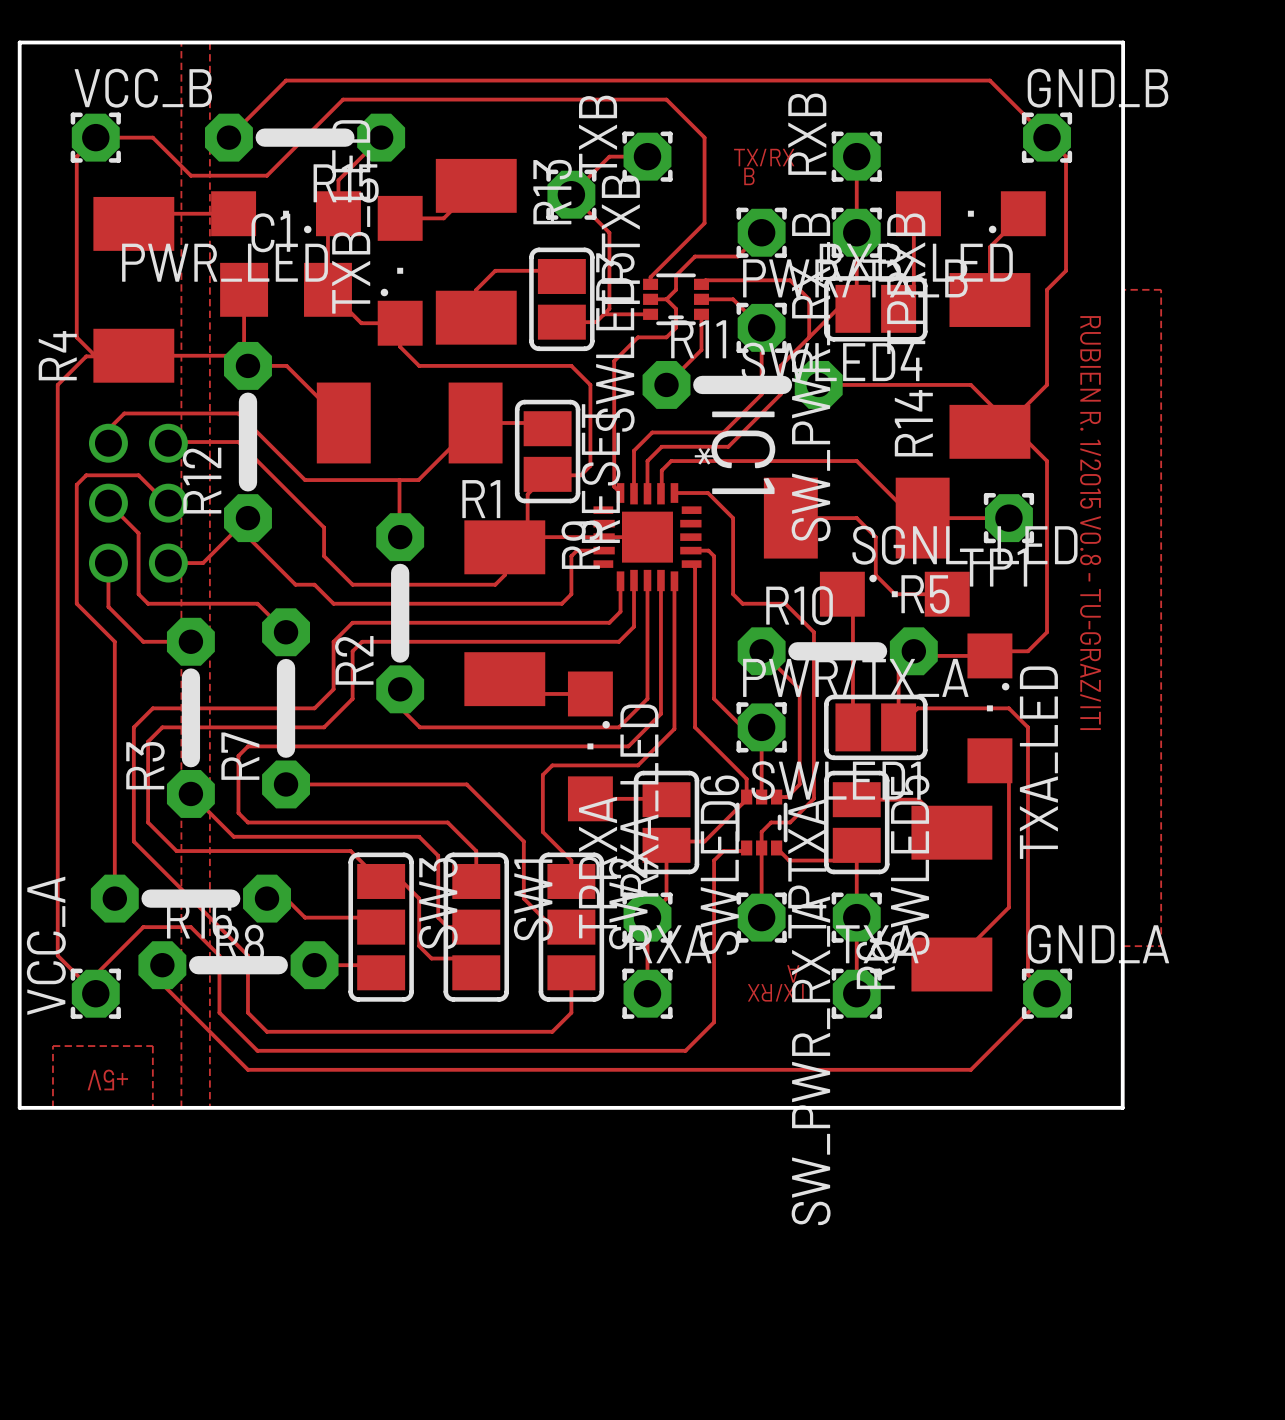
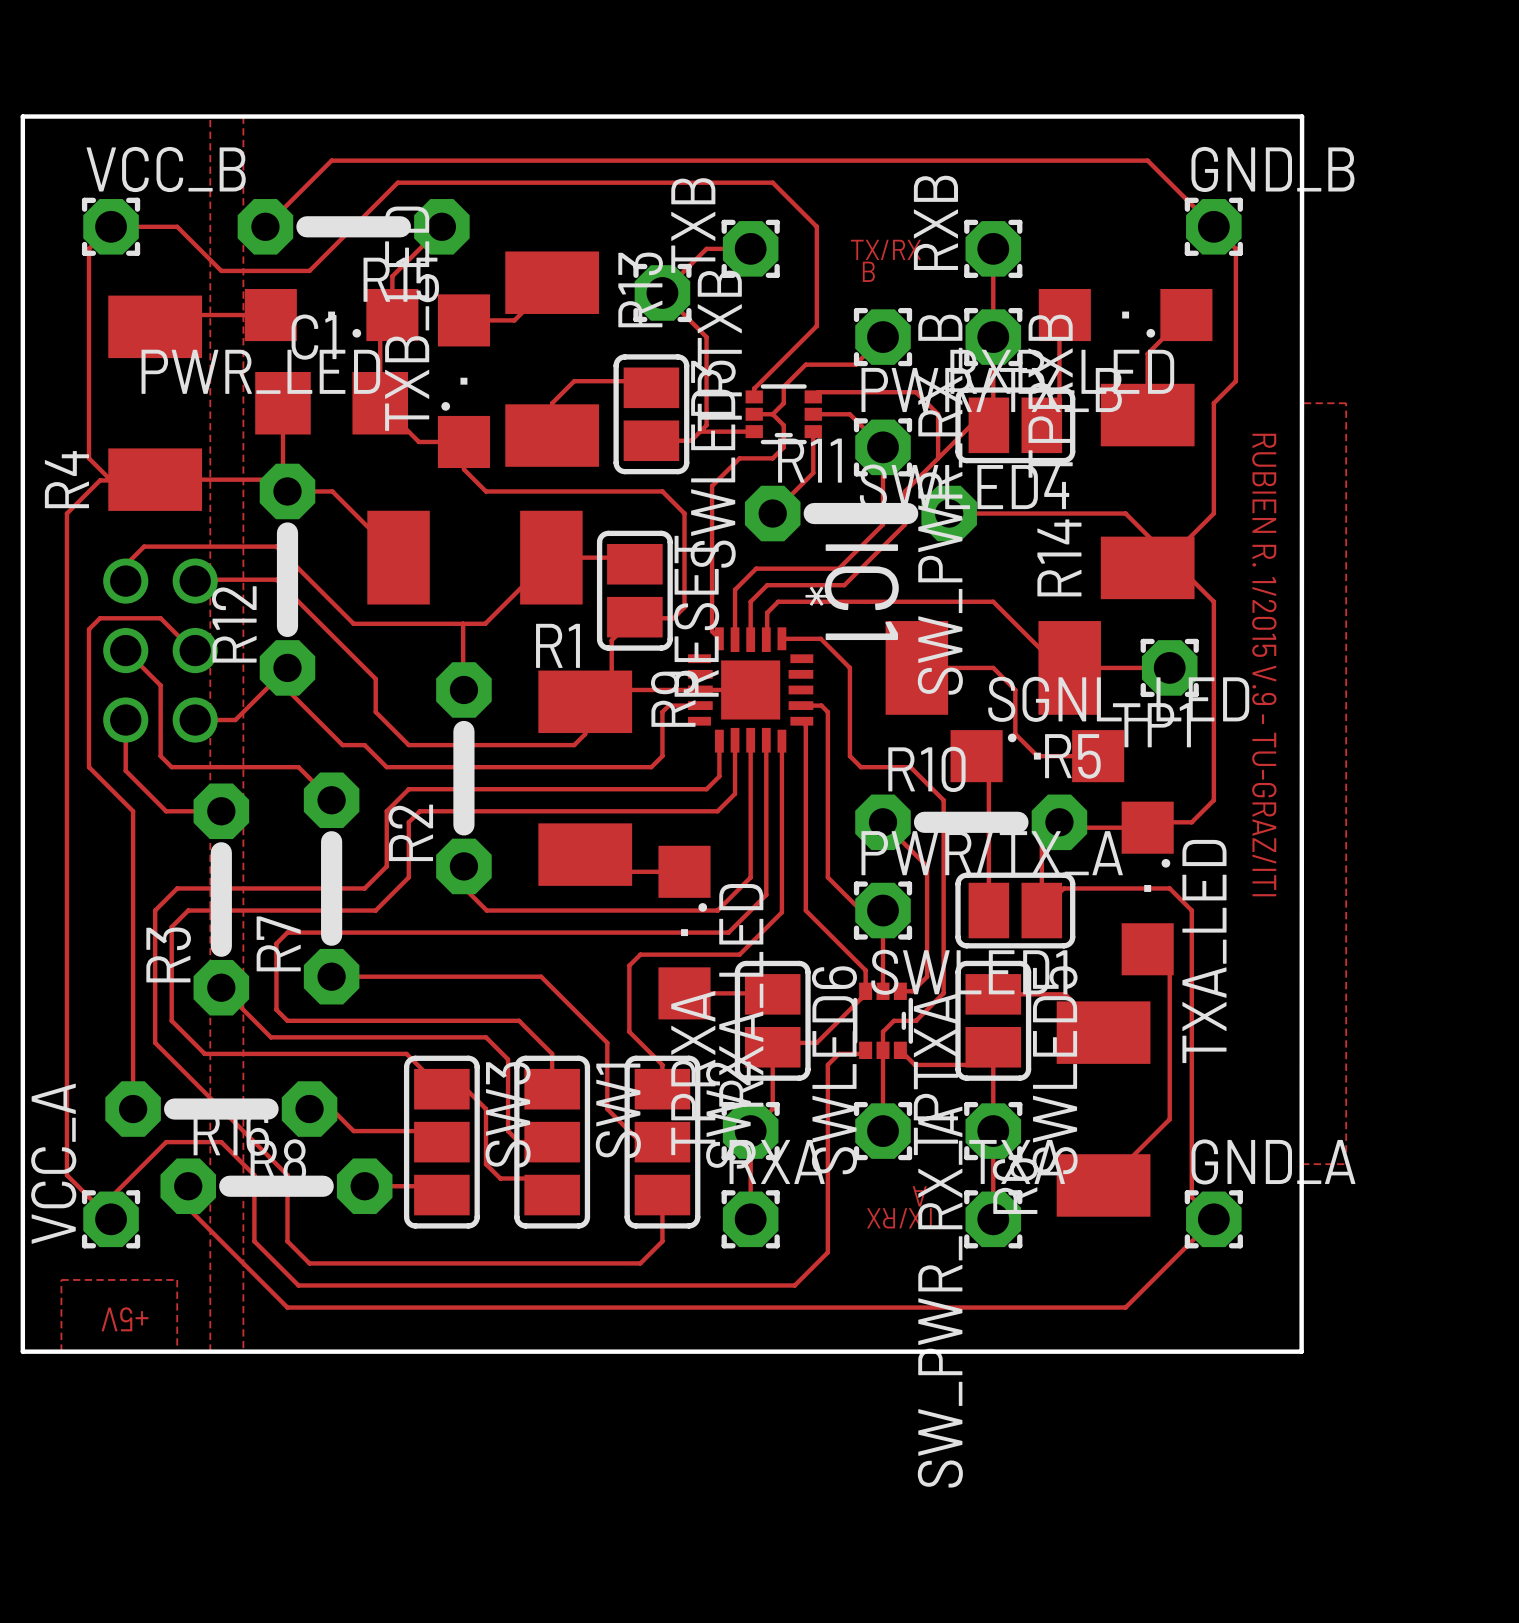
text: RUBIEN R. 1/2015 V0.8 - TU-GRAZ/ITI (1090, 523) -> RUBIEN R. 1/2015 V.9 - TU-GRAZ/ITI (1264, 665)

